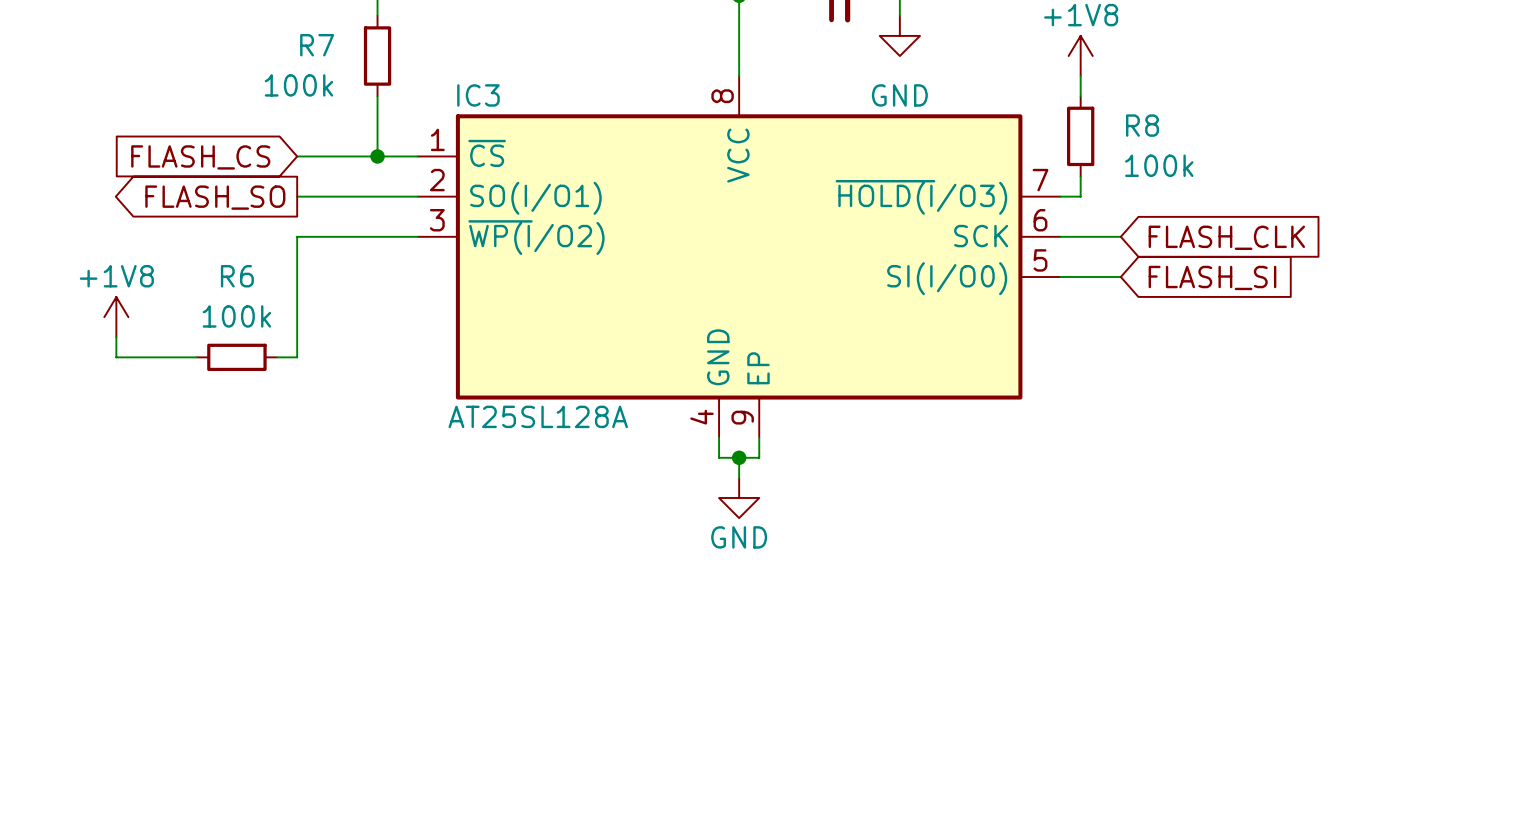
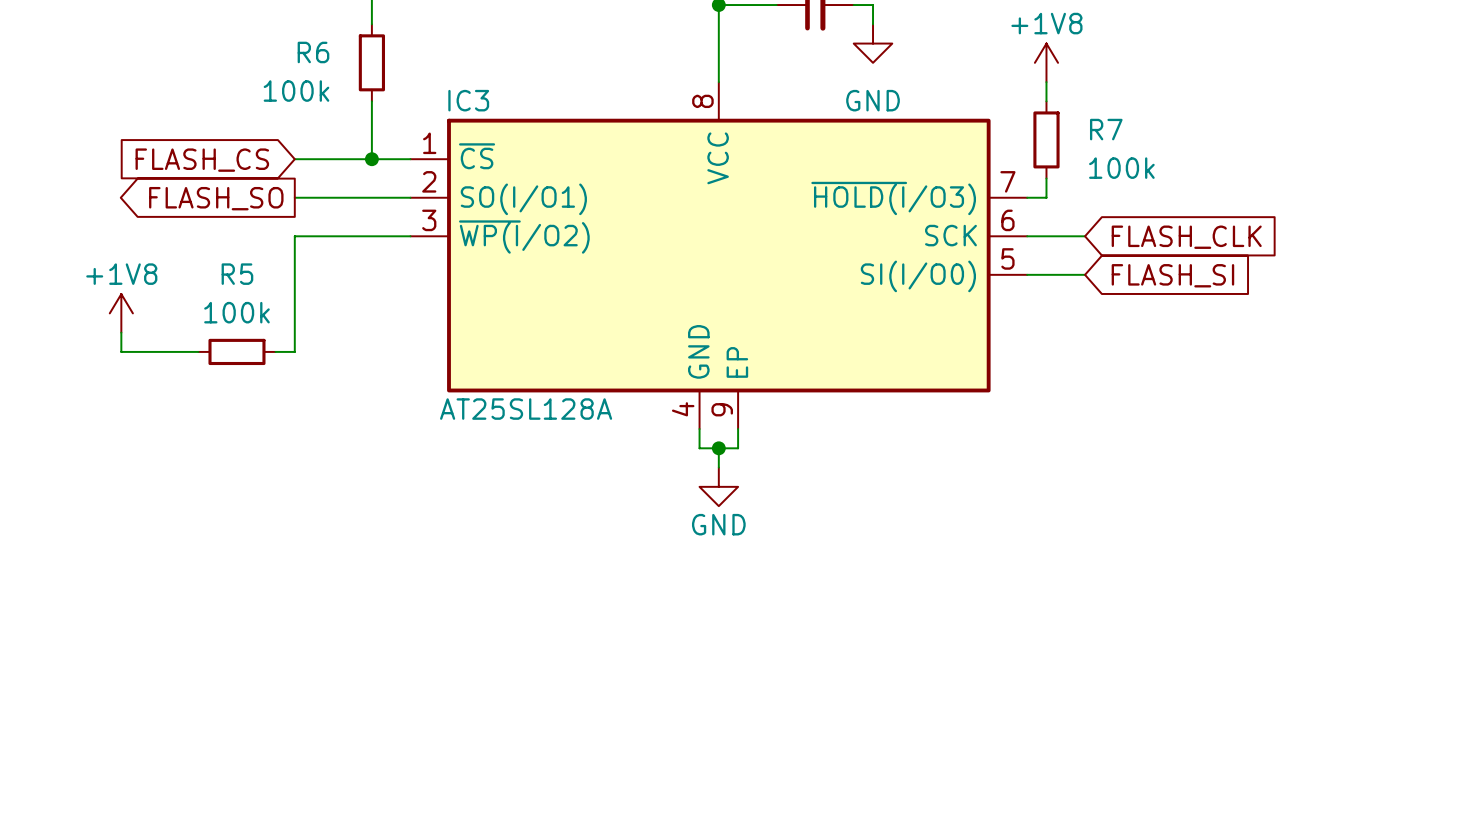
R7 name: R7 (317, 45) -> R6 (313, 52)
R8 name: R8 (1142, 125) -> R7 (1106, 129)
R6 name: R6 (237, 276) -> R5 (237, 274)

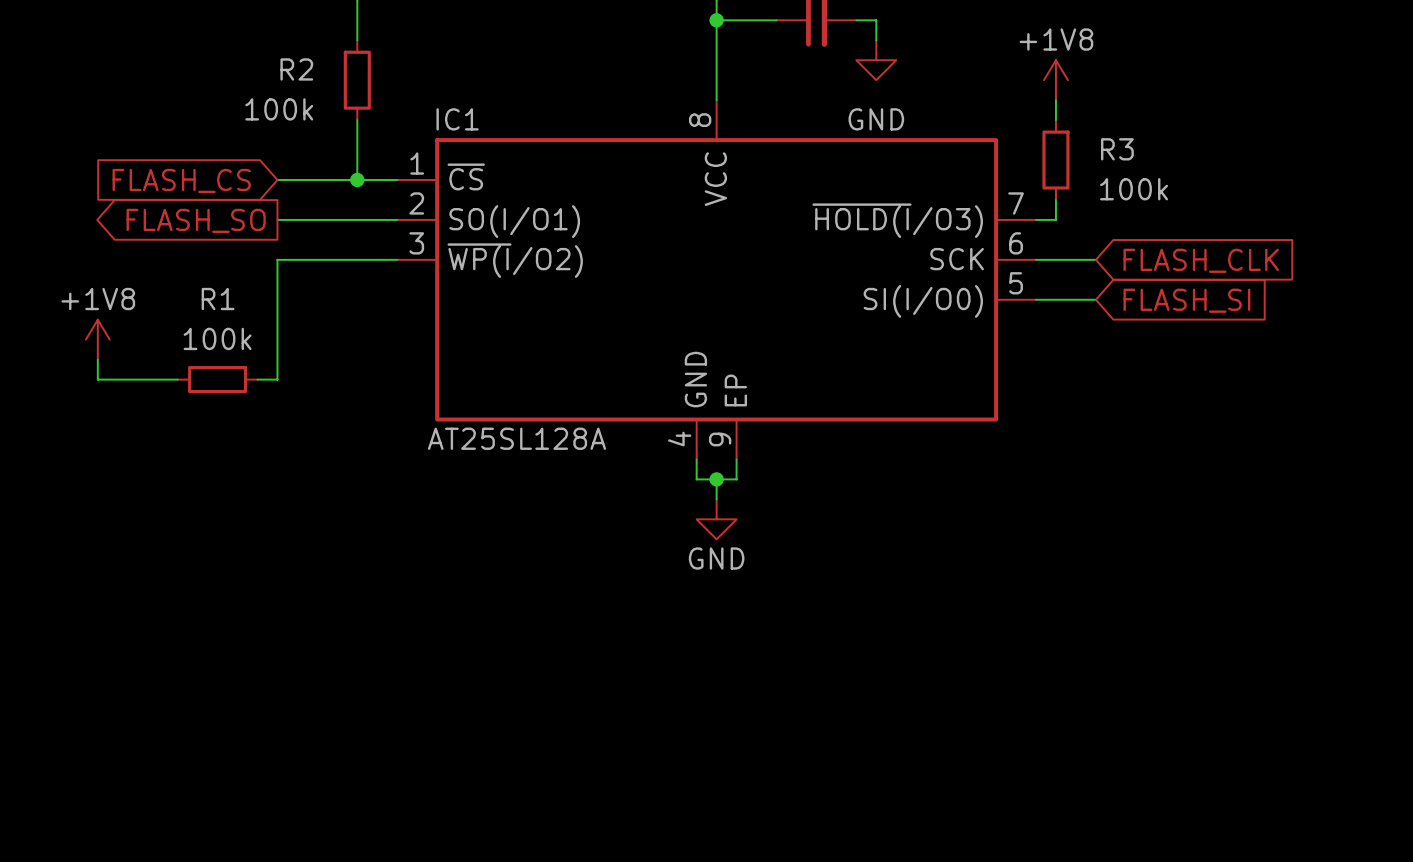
R6 name: R6 (313, 52) -> R2 (296, 69)
IC3 name: IC3 (468, 100) -> IC1 (457, 119)
R7 name: R7 (1106, 129) -> R3 (1117, 149)
R5 name: R5 (237, 274) -> R1 (218, 299)

